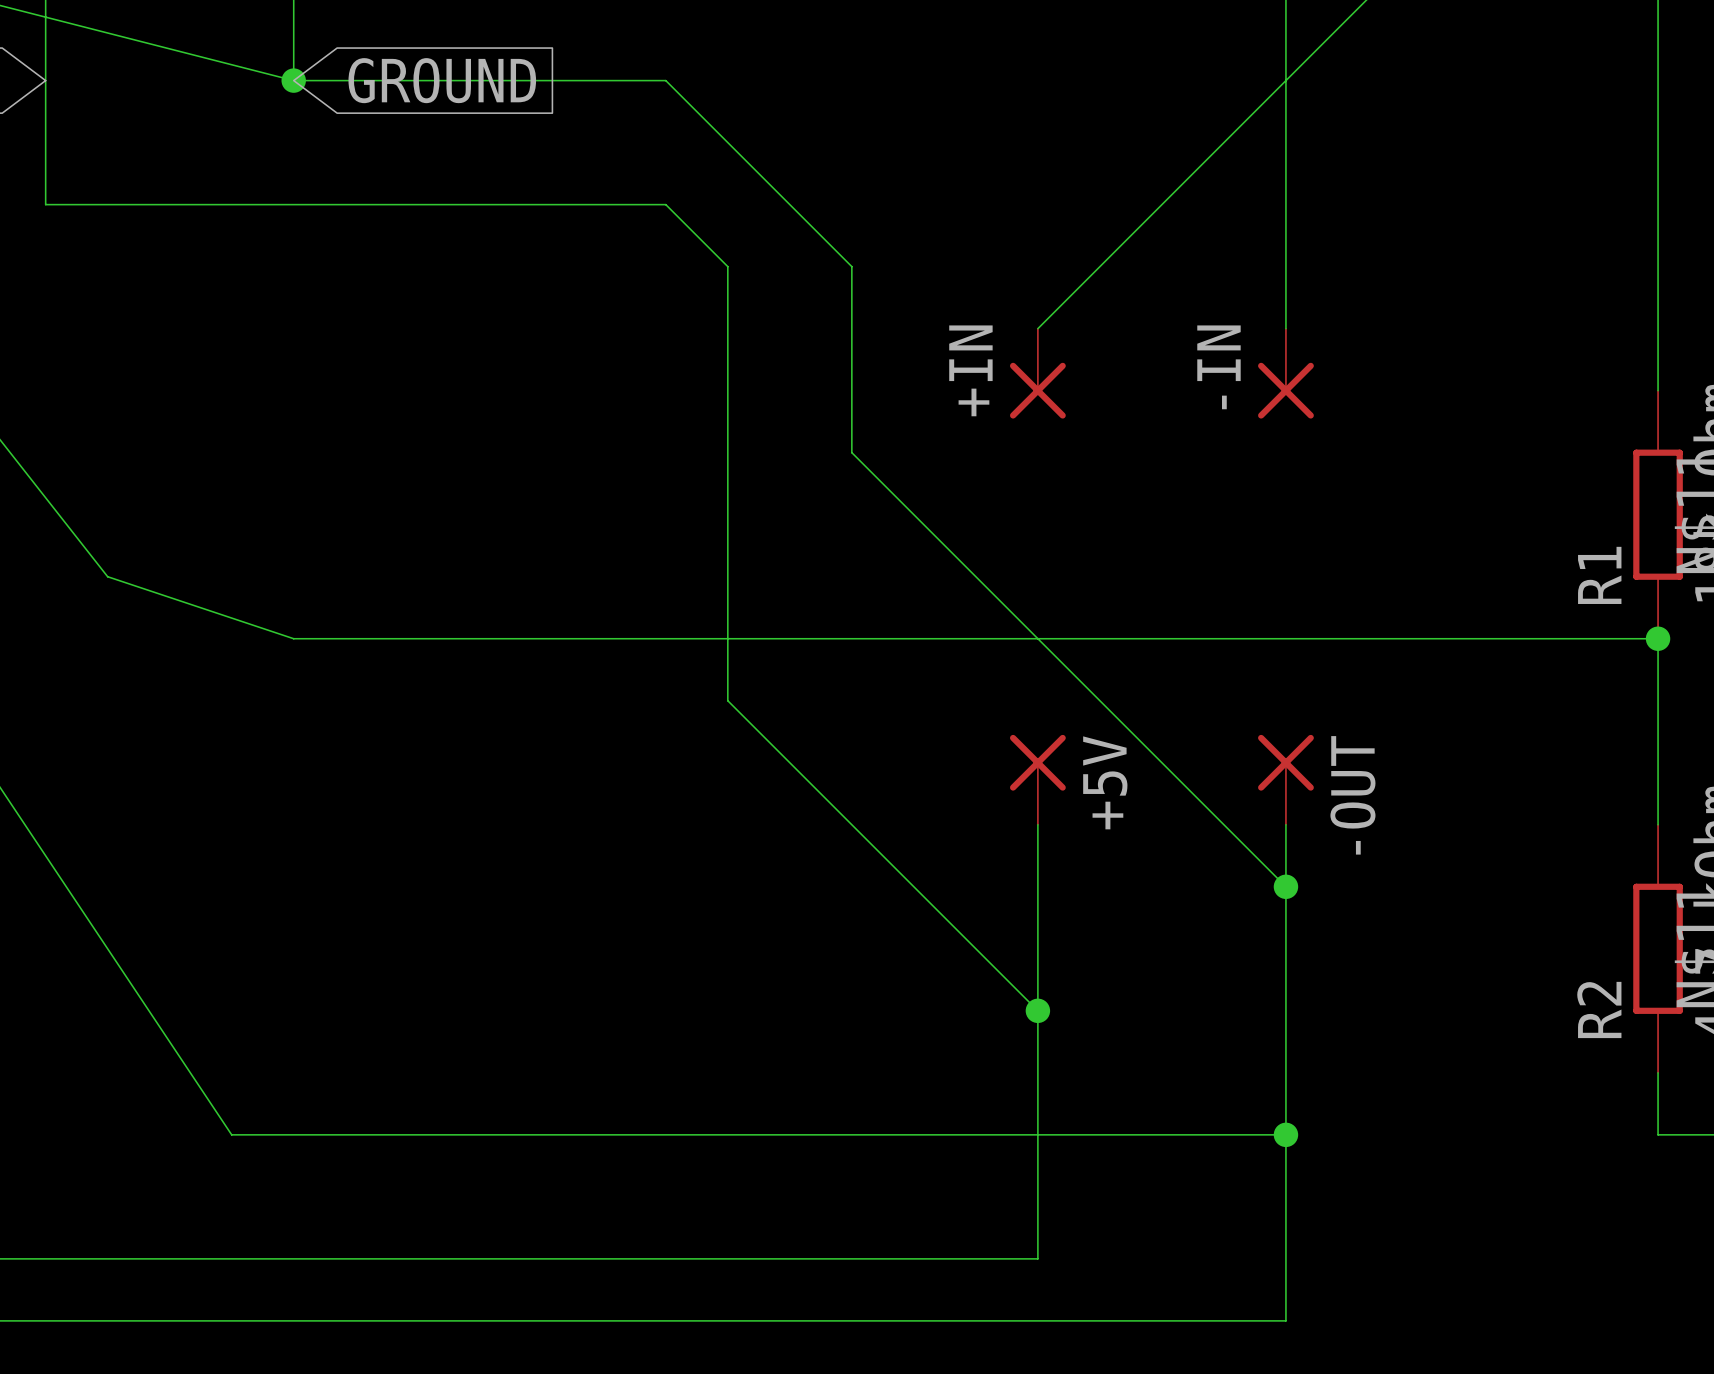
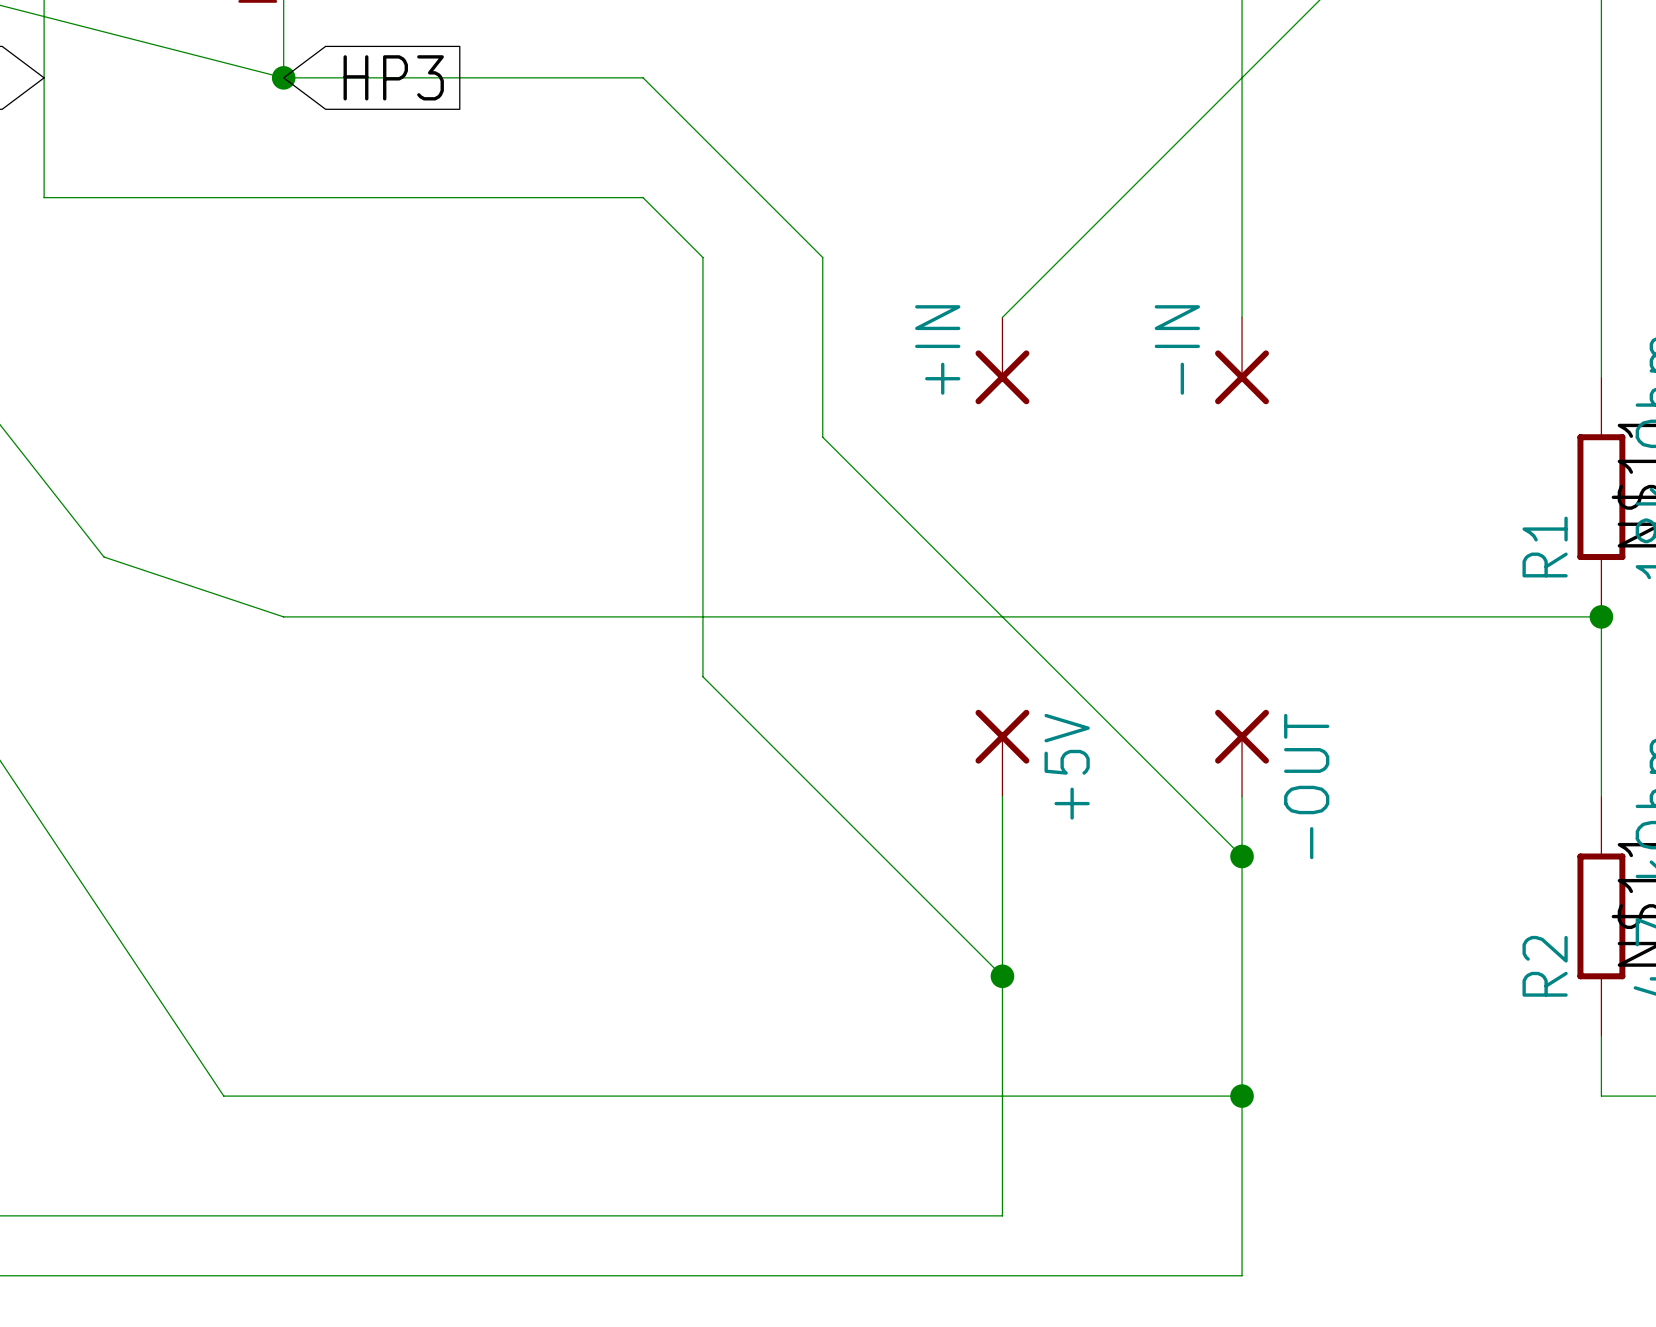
global label: GROUND (442, 80) -> HP3 (393, 77)

